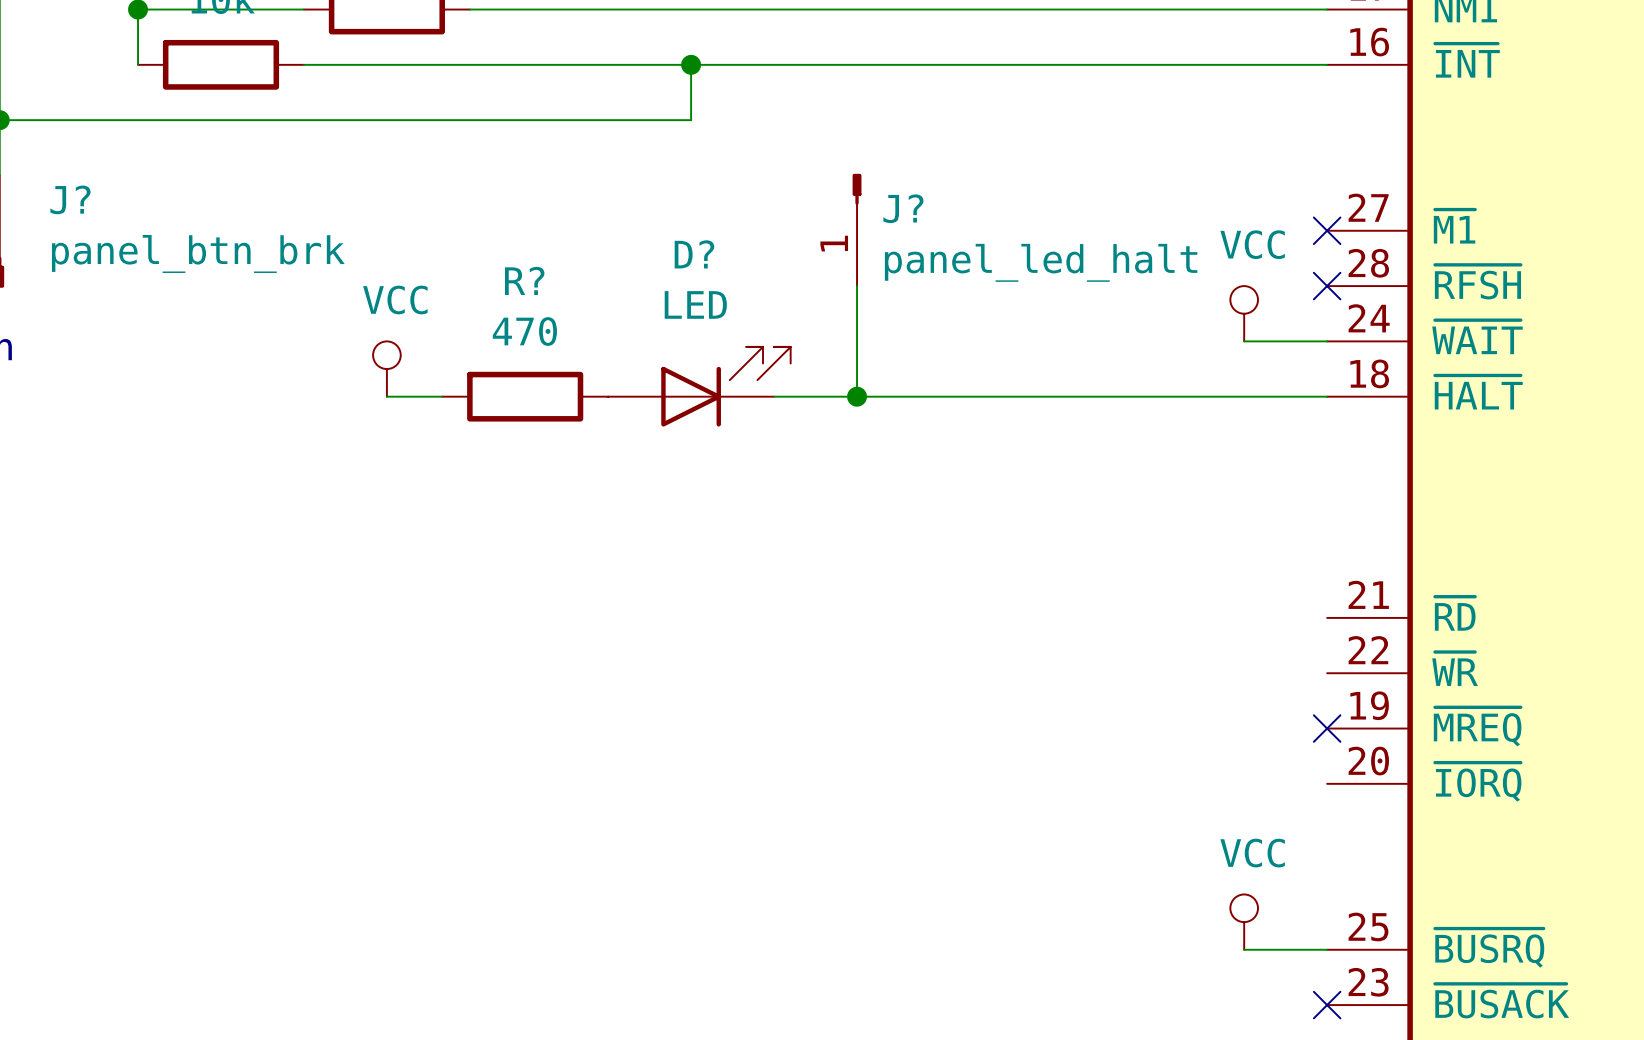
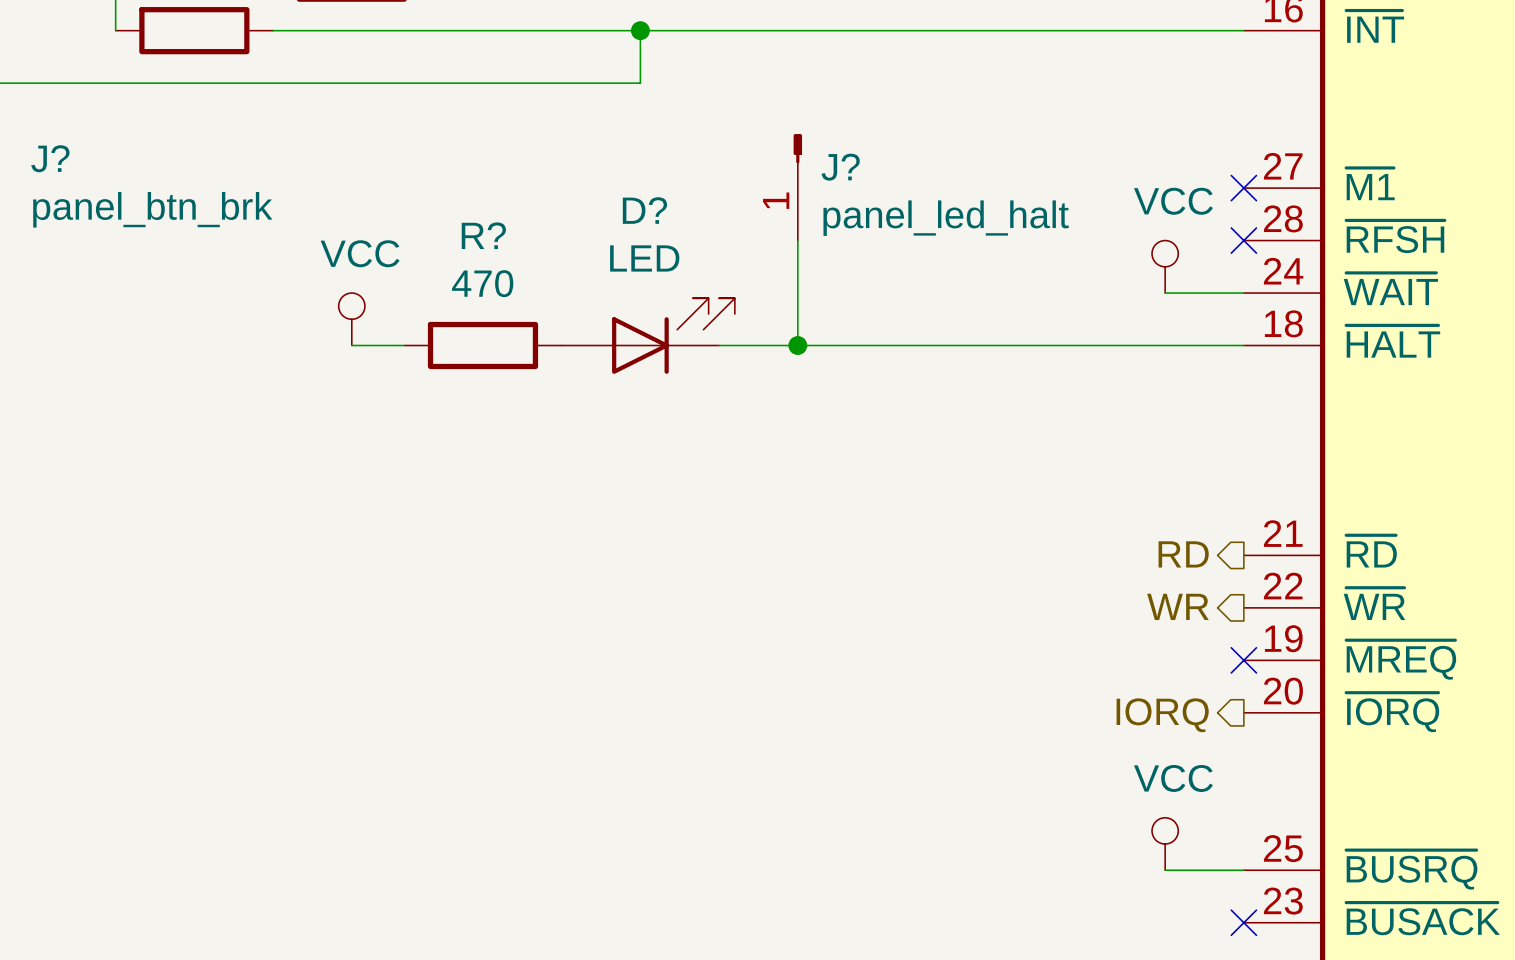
hierarchical label: none -> RD (1183, 554)
hierarchical label: none -> WR (1177, 606)
hierarchical label: none -> IORQ (1162, 715)

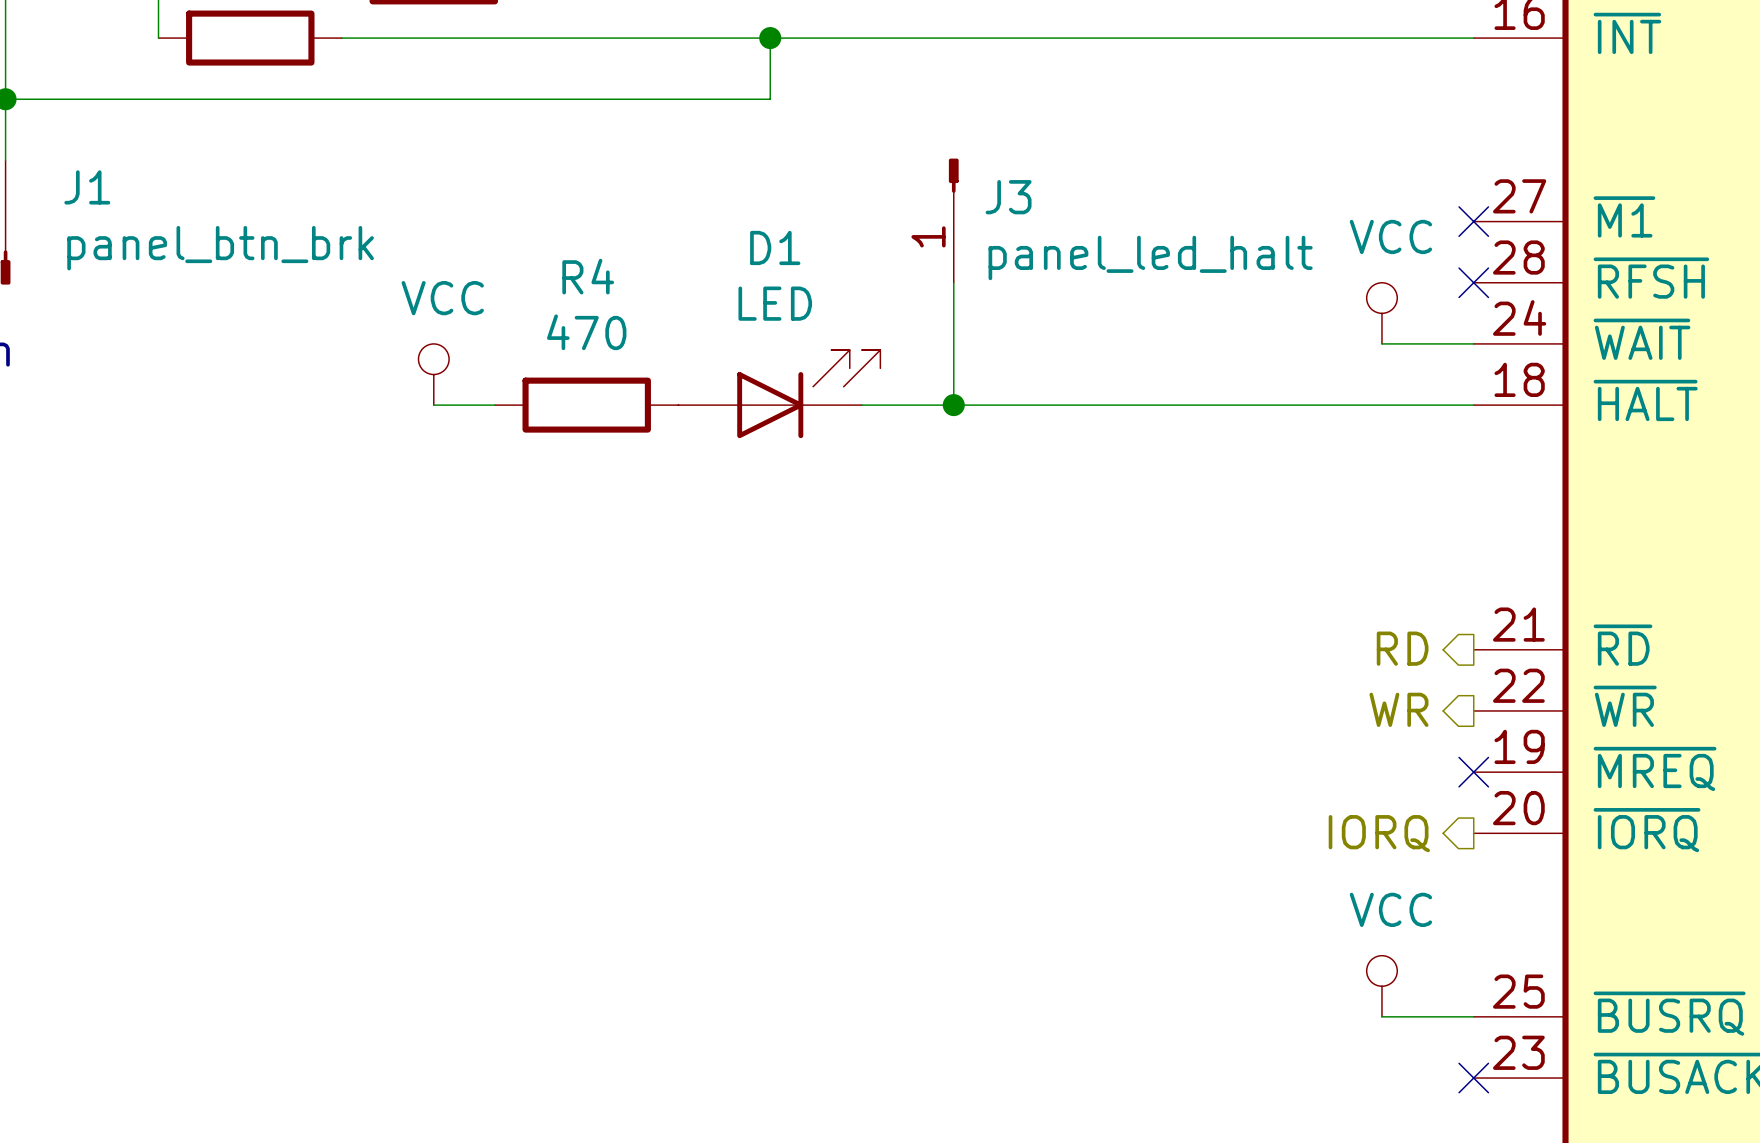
J? name: J? (50, 158) -> J1 (87, 187)
J? name: J? (840, 167) -> J3 (1008, 197)
D? name: D? (644, 210) -> D1 (775, 247)
R? name: R? (483, 235) -> R4 (588, 276)

